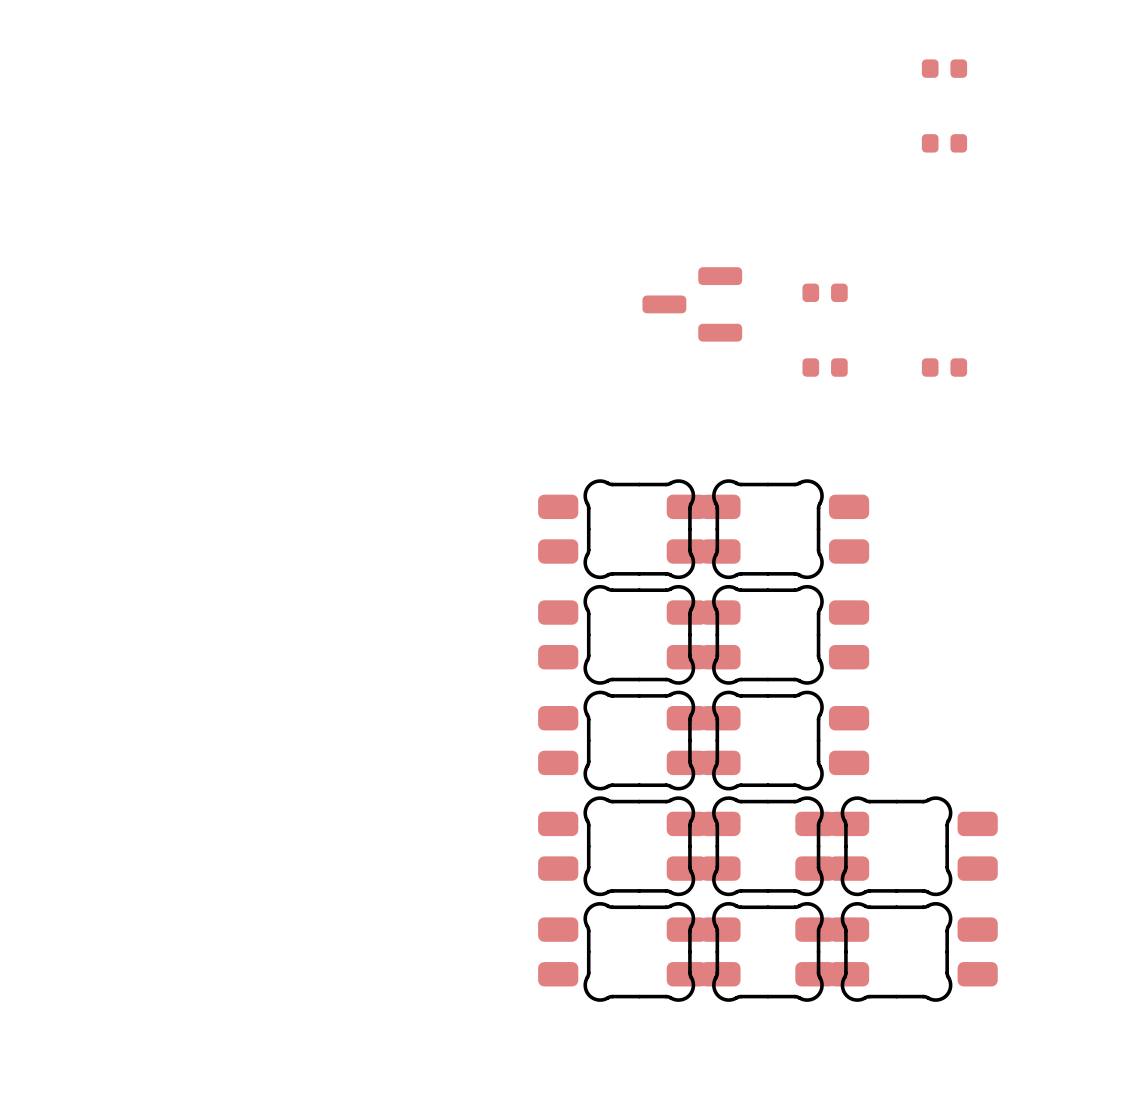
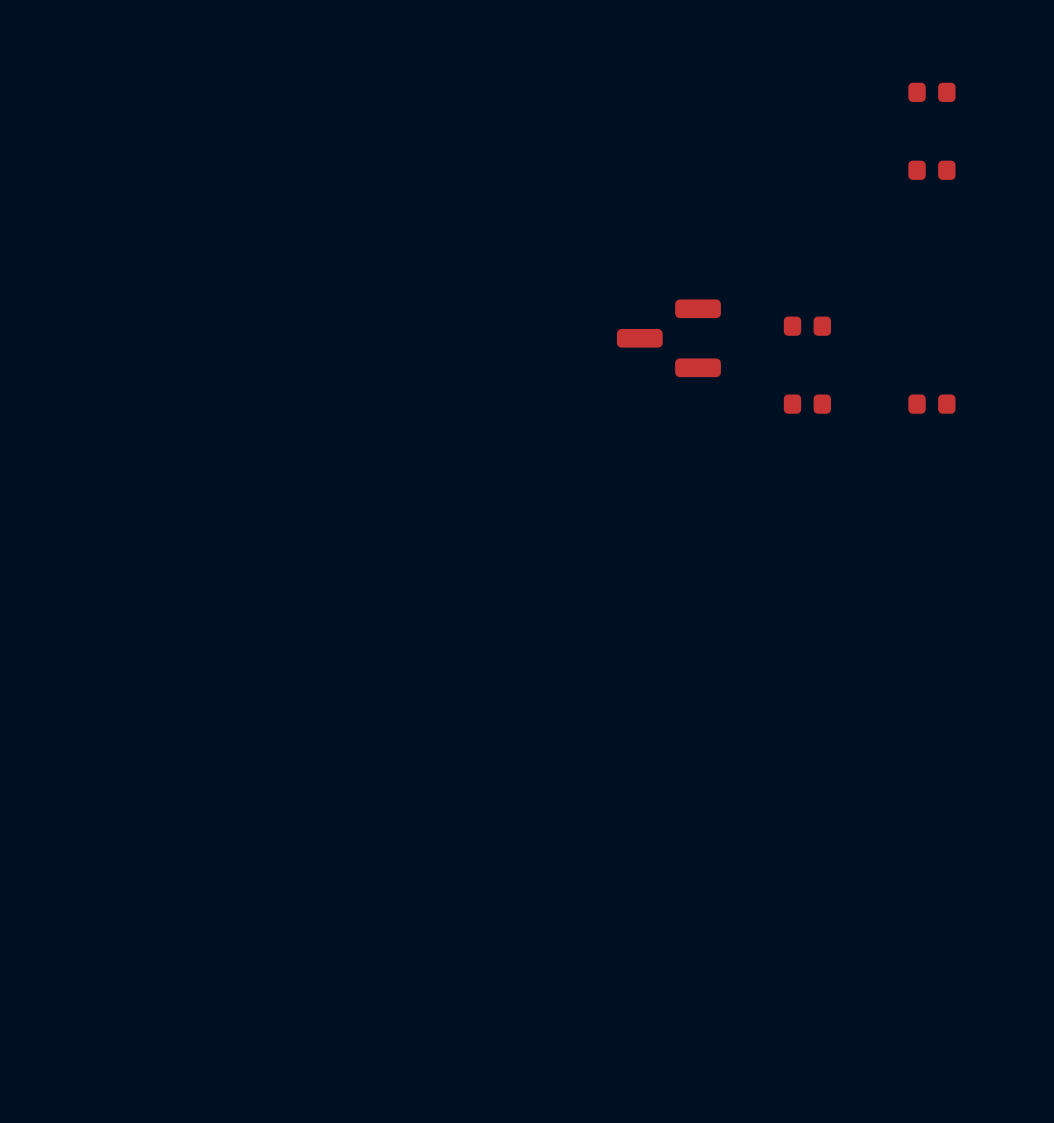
part: (639, 529) -> none
part: (767, 529) -> none
part: (639, 634) -> none
part: (767, 634) -> none
part: (639, 740) -> none
part: (767, 740) -> none
part: (639, 846) -> none
part: (767, 846) -> none
part: (896, 846) -> none
part: (639, 951) -> none
part: (767, 951) -> none
part: (896, 951) -> none

